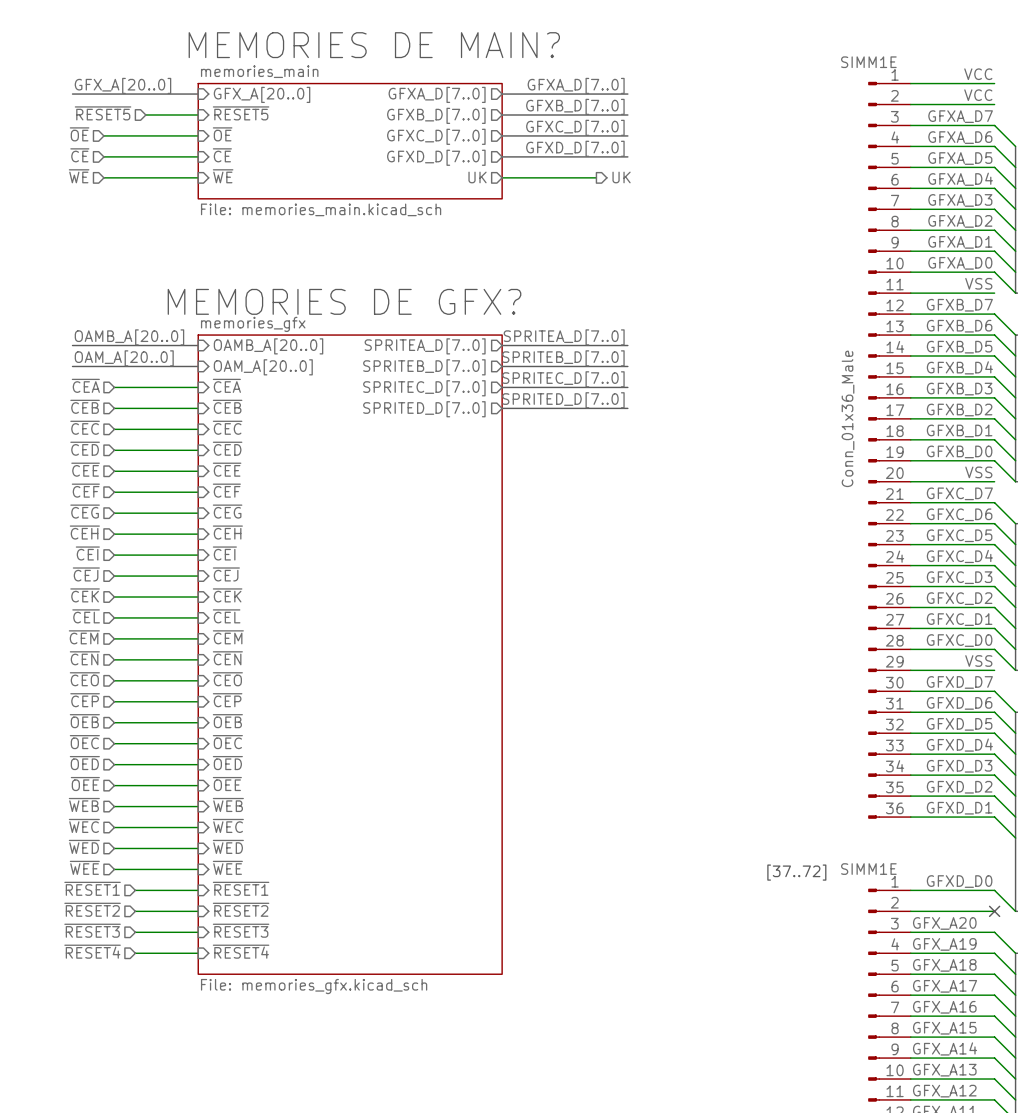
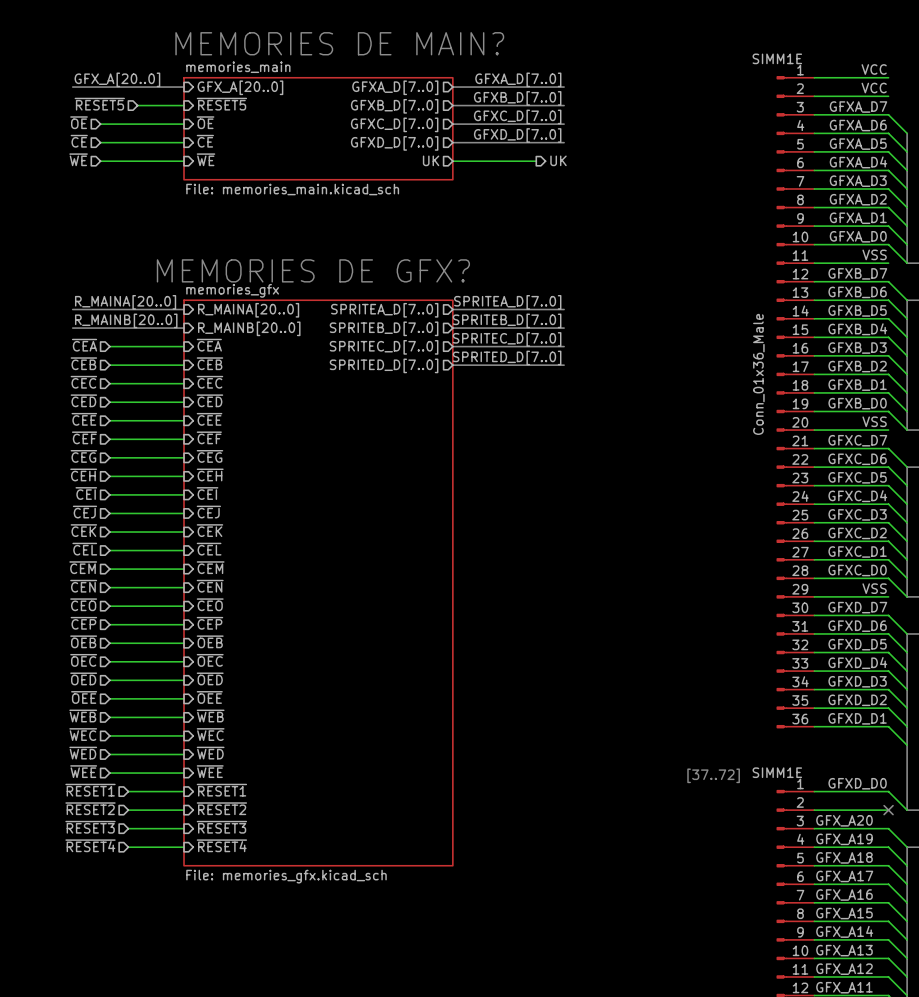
label: OAMB_A[20..0] (129, 337) -> R_MAINA[20..0] (125, 302)
sheet pin: OAMB_A[20..0] (268, 346) -> R_MAINA[20..0] (248, 310)
label: OAM_A[20..0] (124, 358) -> R_MAINB[20..0] (126, 320)
sheet pin: OAM_A[20..0] (263, 367) -> R_MAINB[20..0] (249, 328)

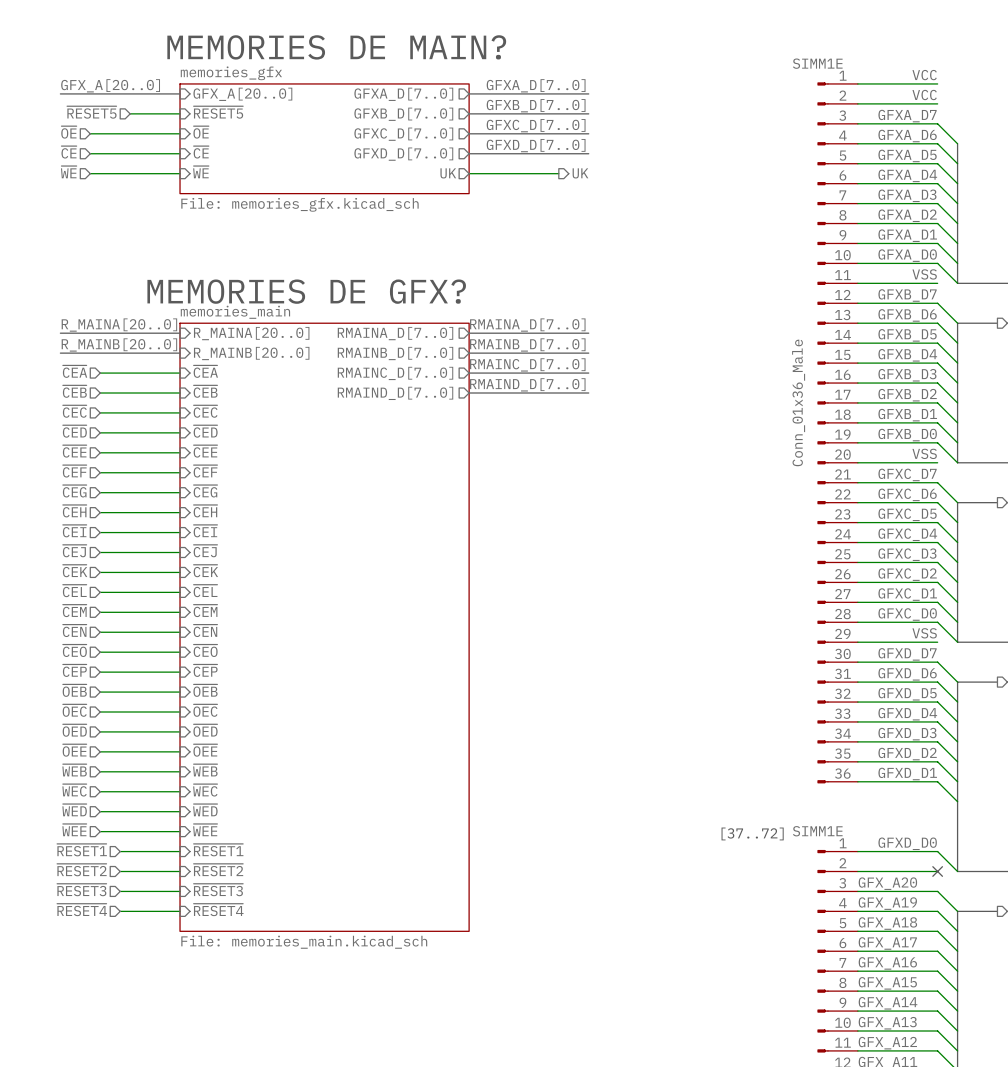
sheet memories_main name: memories_main (238, 67) -> memories_gfx (231, 73)
sheet memories_main value: File: memories_main.kicad_sch (292, 189) -> File: memories_gfx.kicad_sch (299, 204)
sheet memories_gfx name: memories_gfx (232, 290) -> memories_main (235, 312)
label: SPRITEA_D[7..0] (507, 302) -> RMAINA_D[7..0] (527, 325)
sheet pin: SPRITEA_D[7..0] (384, 310) -> RMAINA_D[7..0] (395, 333)
label: SPRITEB_D[7..0] (507, 320) -> RMAINB_D[7..0] (527, 344)
sheet pin: SPRITEB_D[7..0] (384, 328) -> RMAINB_D[7..0] (395, 353)
label: SPRITEC_D[7..0] (507, 339) -> RMAINC_D[7..0] (527, 364)
sheet pin: SPRITEC_D[7..0] (384, 347) -> RMAINC_D[7..0] (395, 373)
label: SPRITED_D[7..0] (507, 357) -> RMAIND_D[7..0] (527, 384)
sheet pin: SPRITED_D[7..0] (384, 365) -> RMAIND_D[7..0] (395, 393)
sheet memories_gfx value: File: memories_gfx.kicad_sch (286, 876) -> File: memories_main.kicad_sch (304, 942)

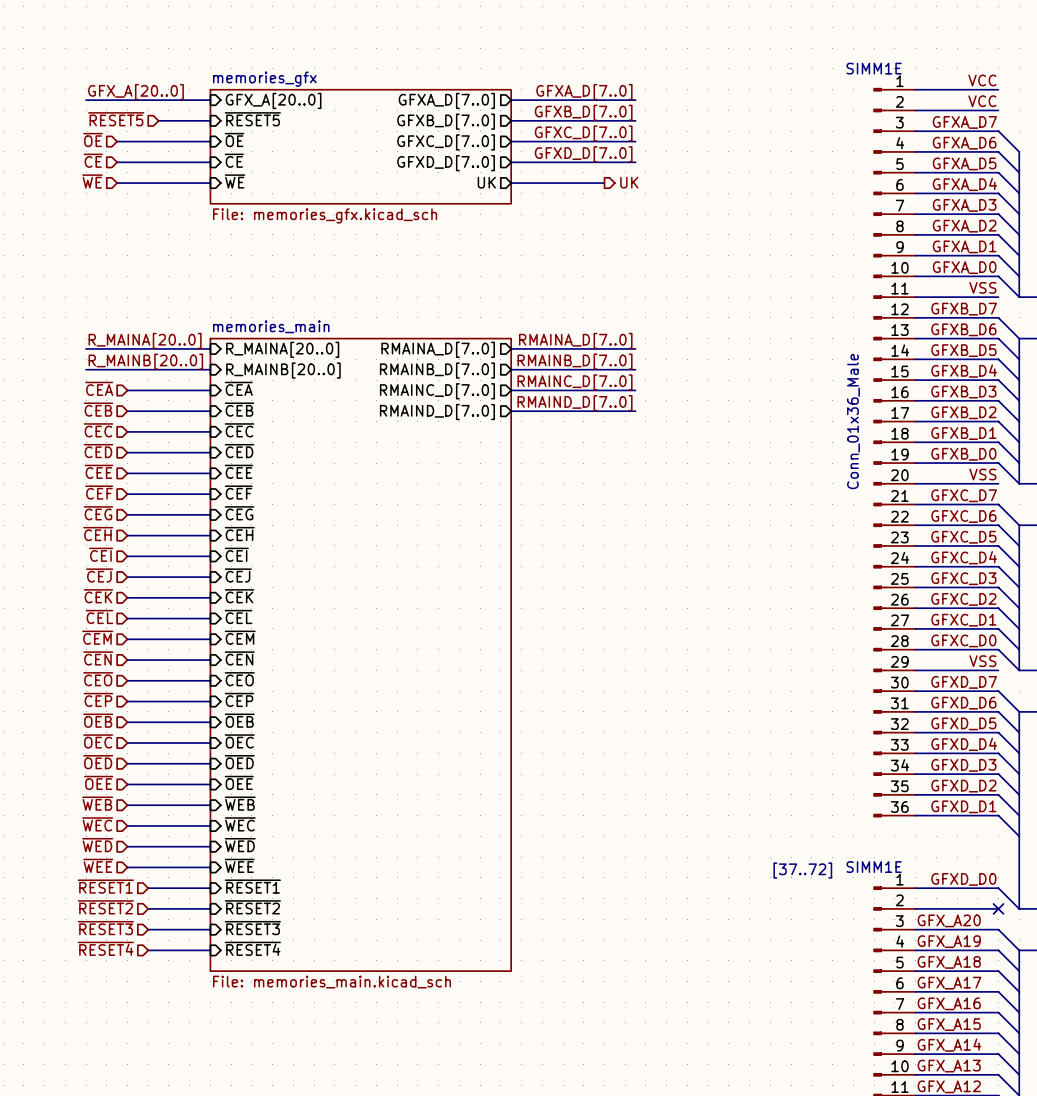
text: MEMORIES DE MAIN? (336, 47) -> none
text: MEMORIES DE GFX? (306, 291) -> none

